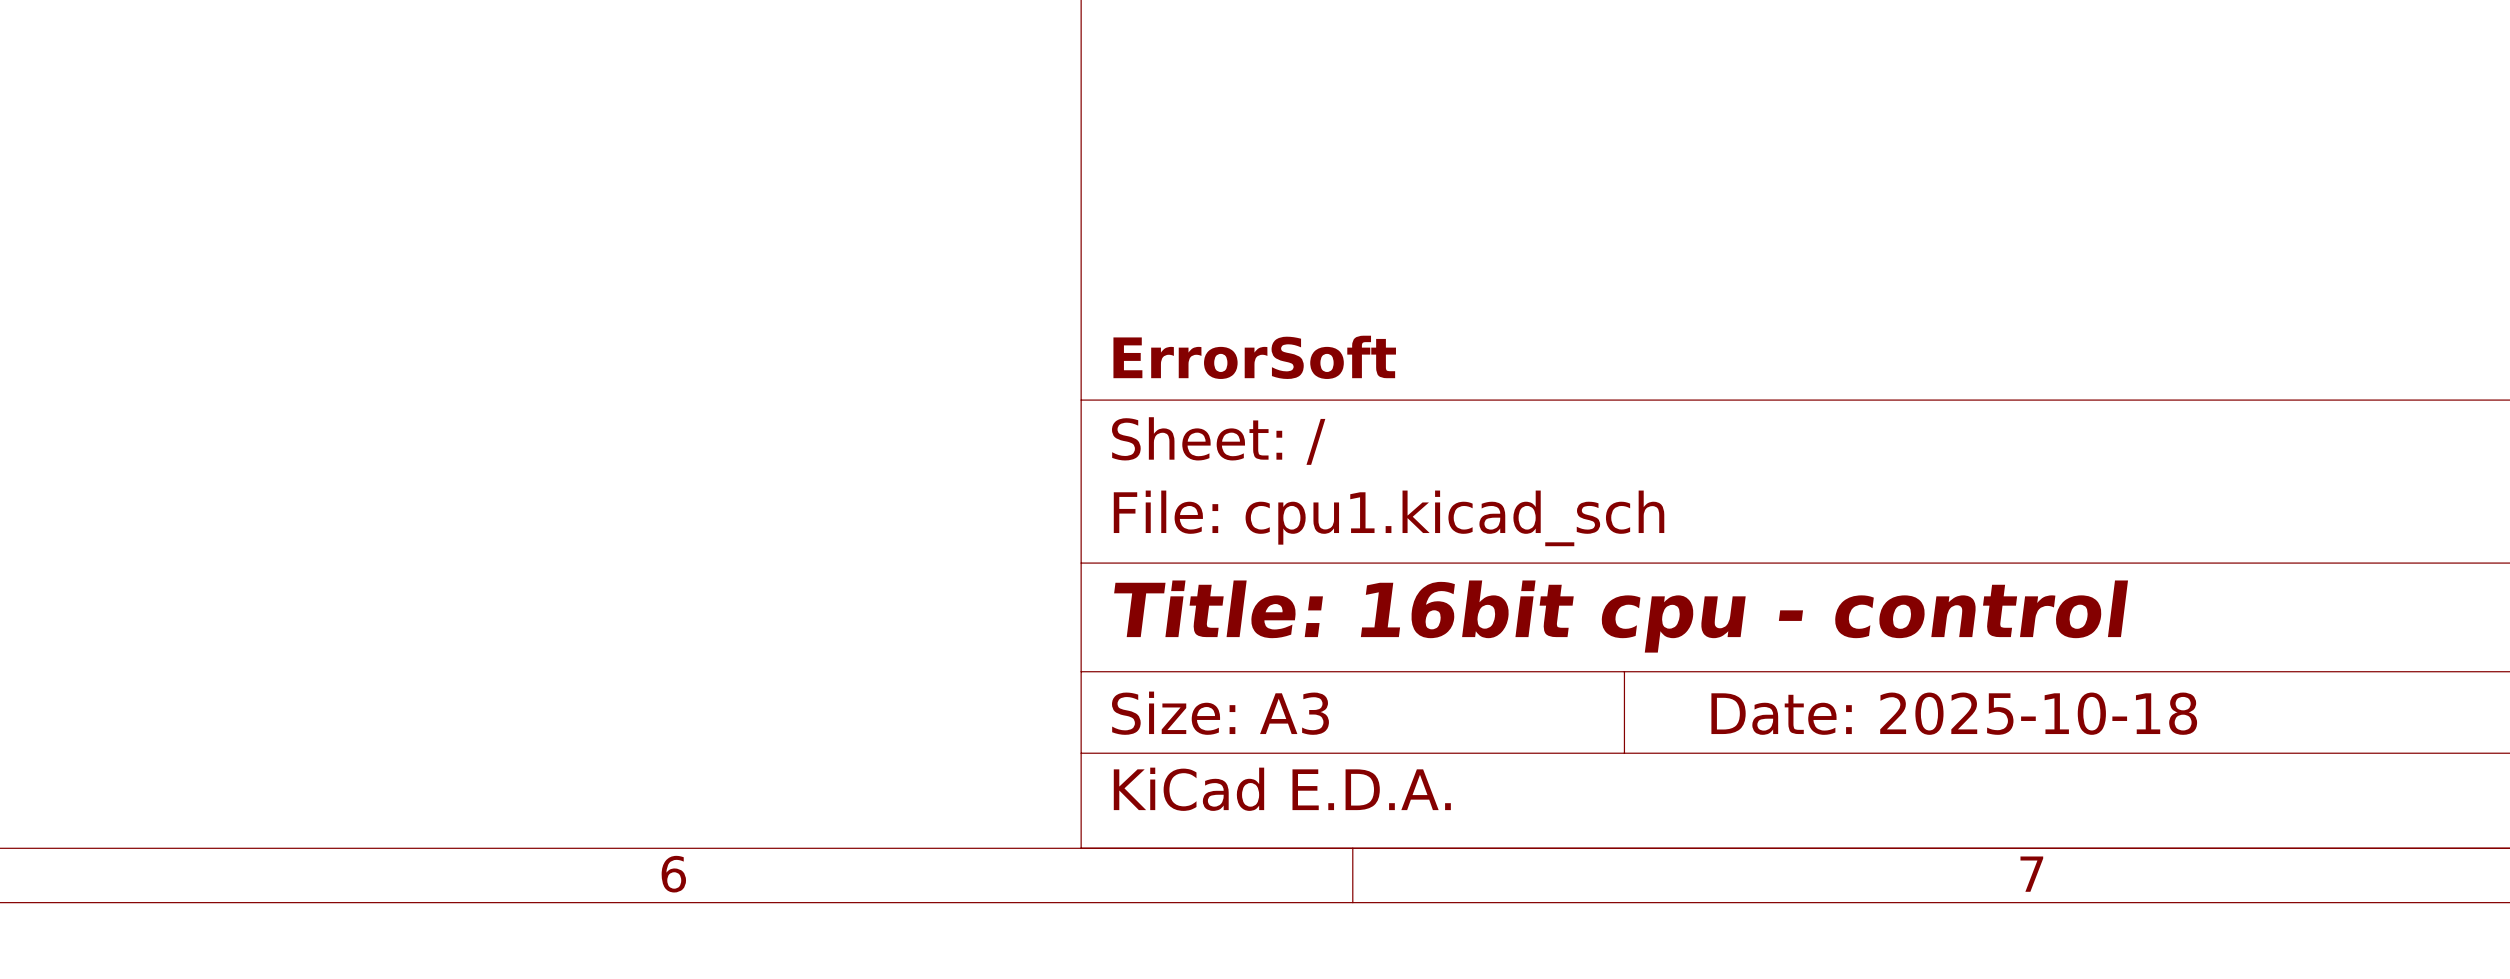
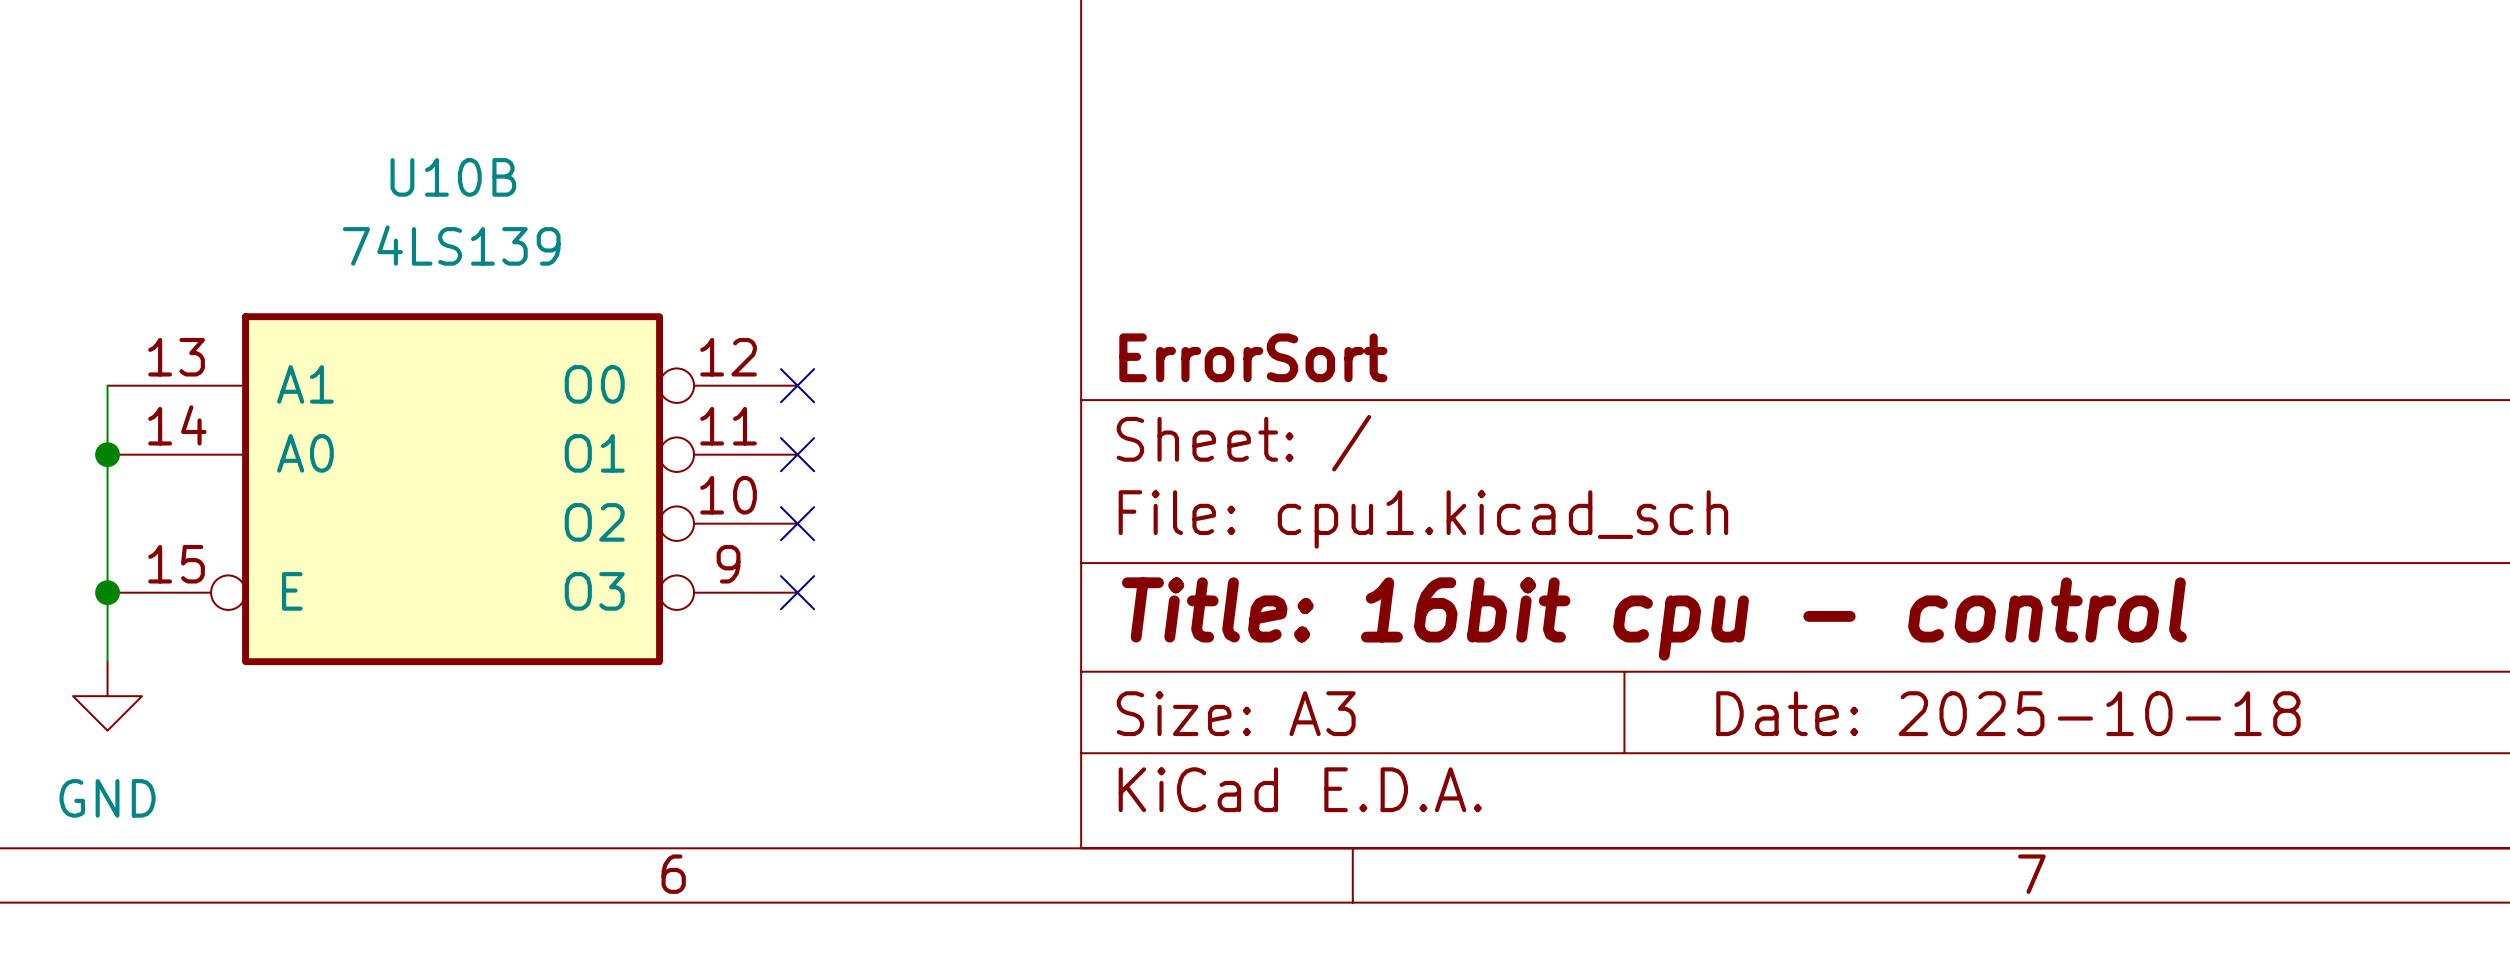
title block: ErrorSoft (1254, 357) -> ErrorSort (1253, 357)
wire: none -> (107, 385) (107, 661)
no-connect mark: none -> (797, 385)
junction: none -> (107, 454)
no-connect mark: none -> (797, 454)
U10B: none -> 74LS139 (452, 489)
no-connect mark: none -> (797, 523)
junction: none -> (107, 592)
no-connect mark: none -> (797, 592)
power symbol: none -> GND (107, 696)

